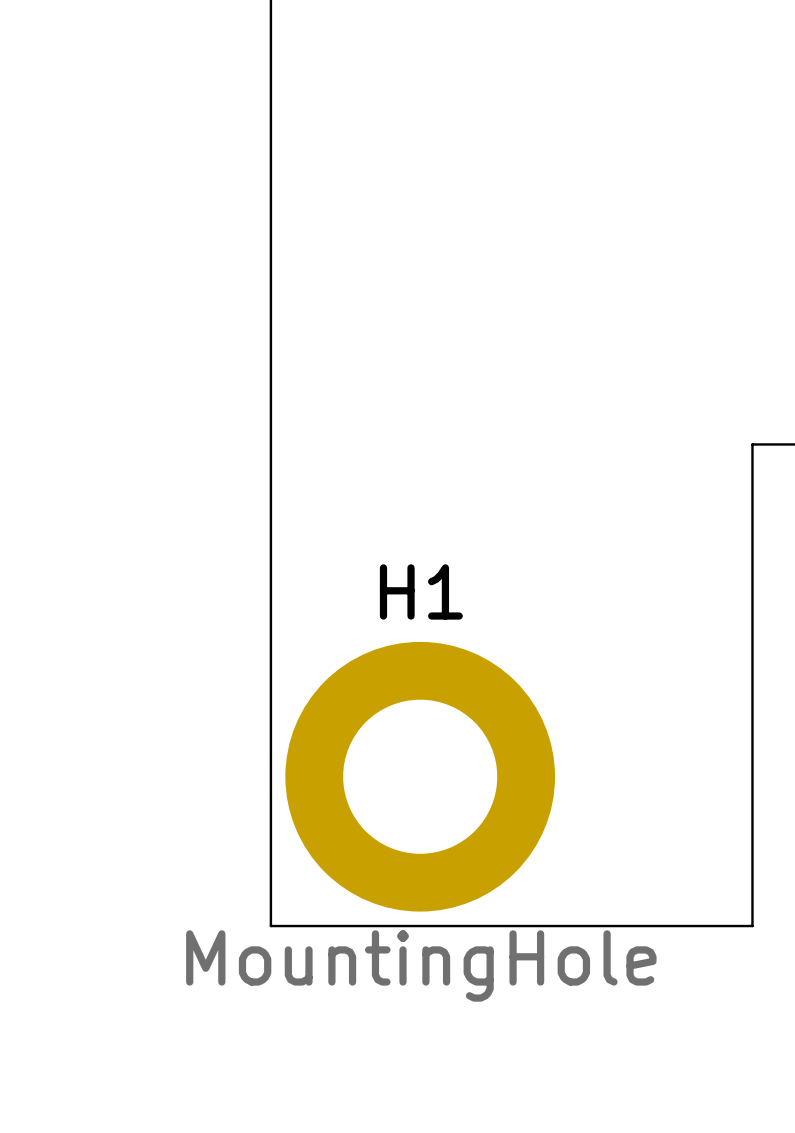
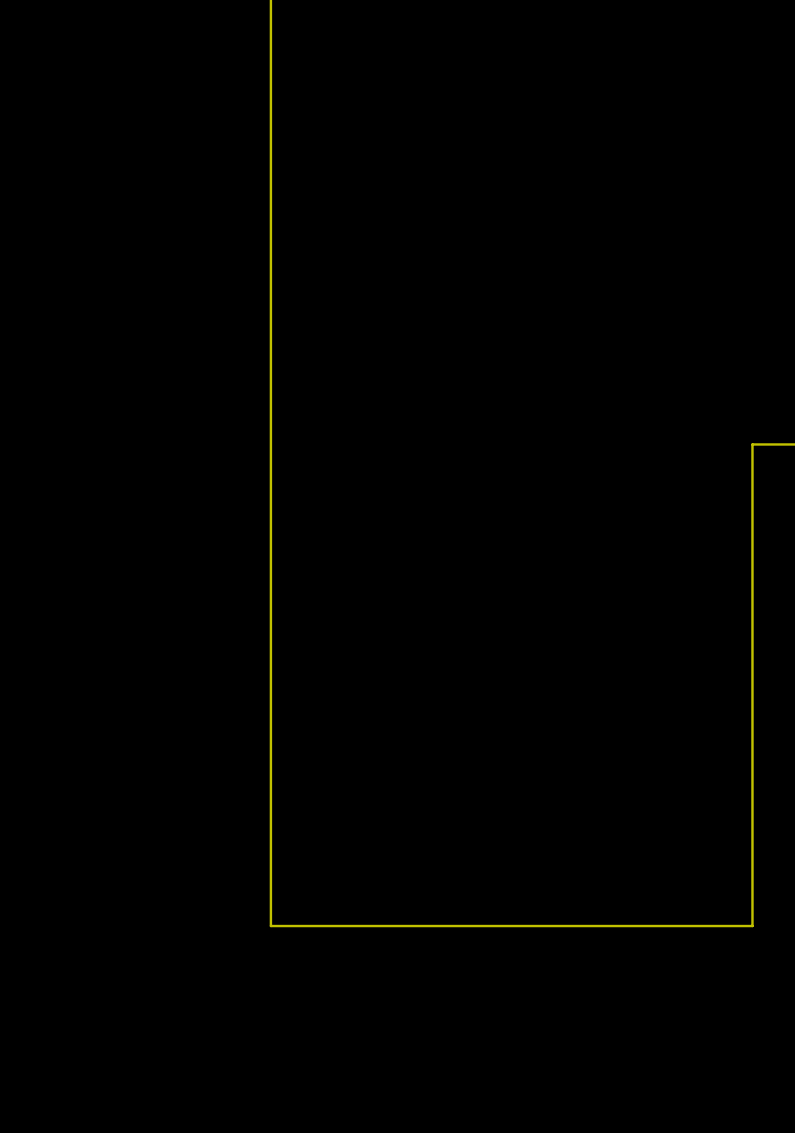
H1: MountingHole (420, 776) -> none

